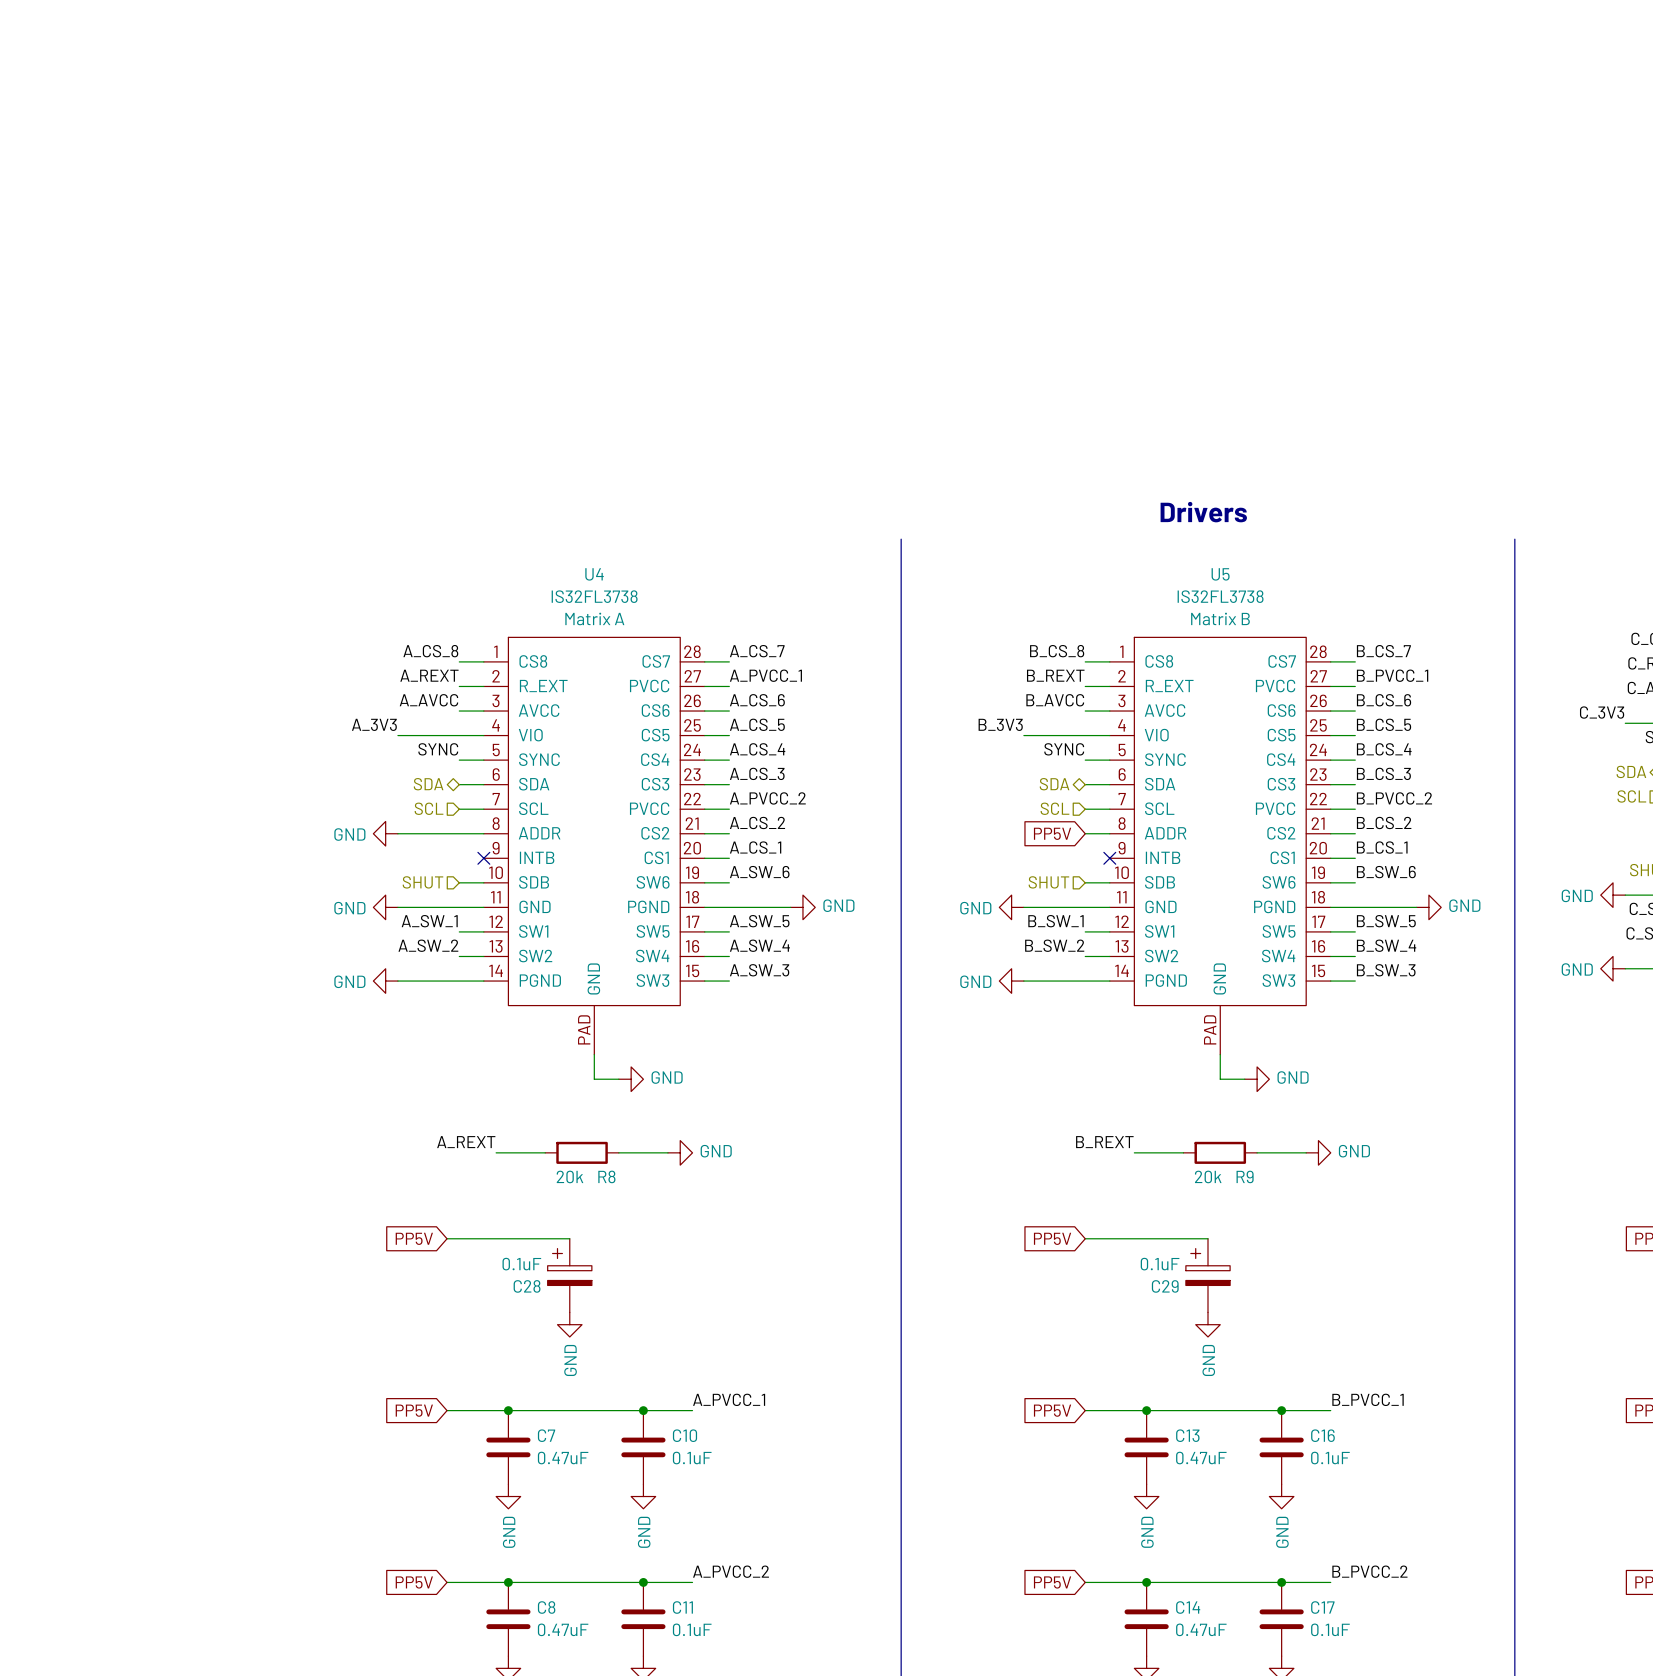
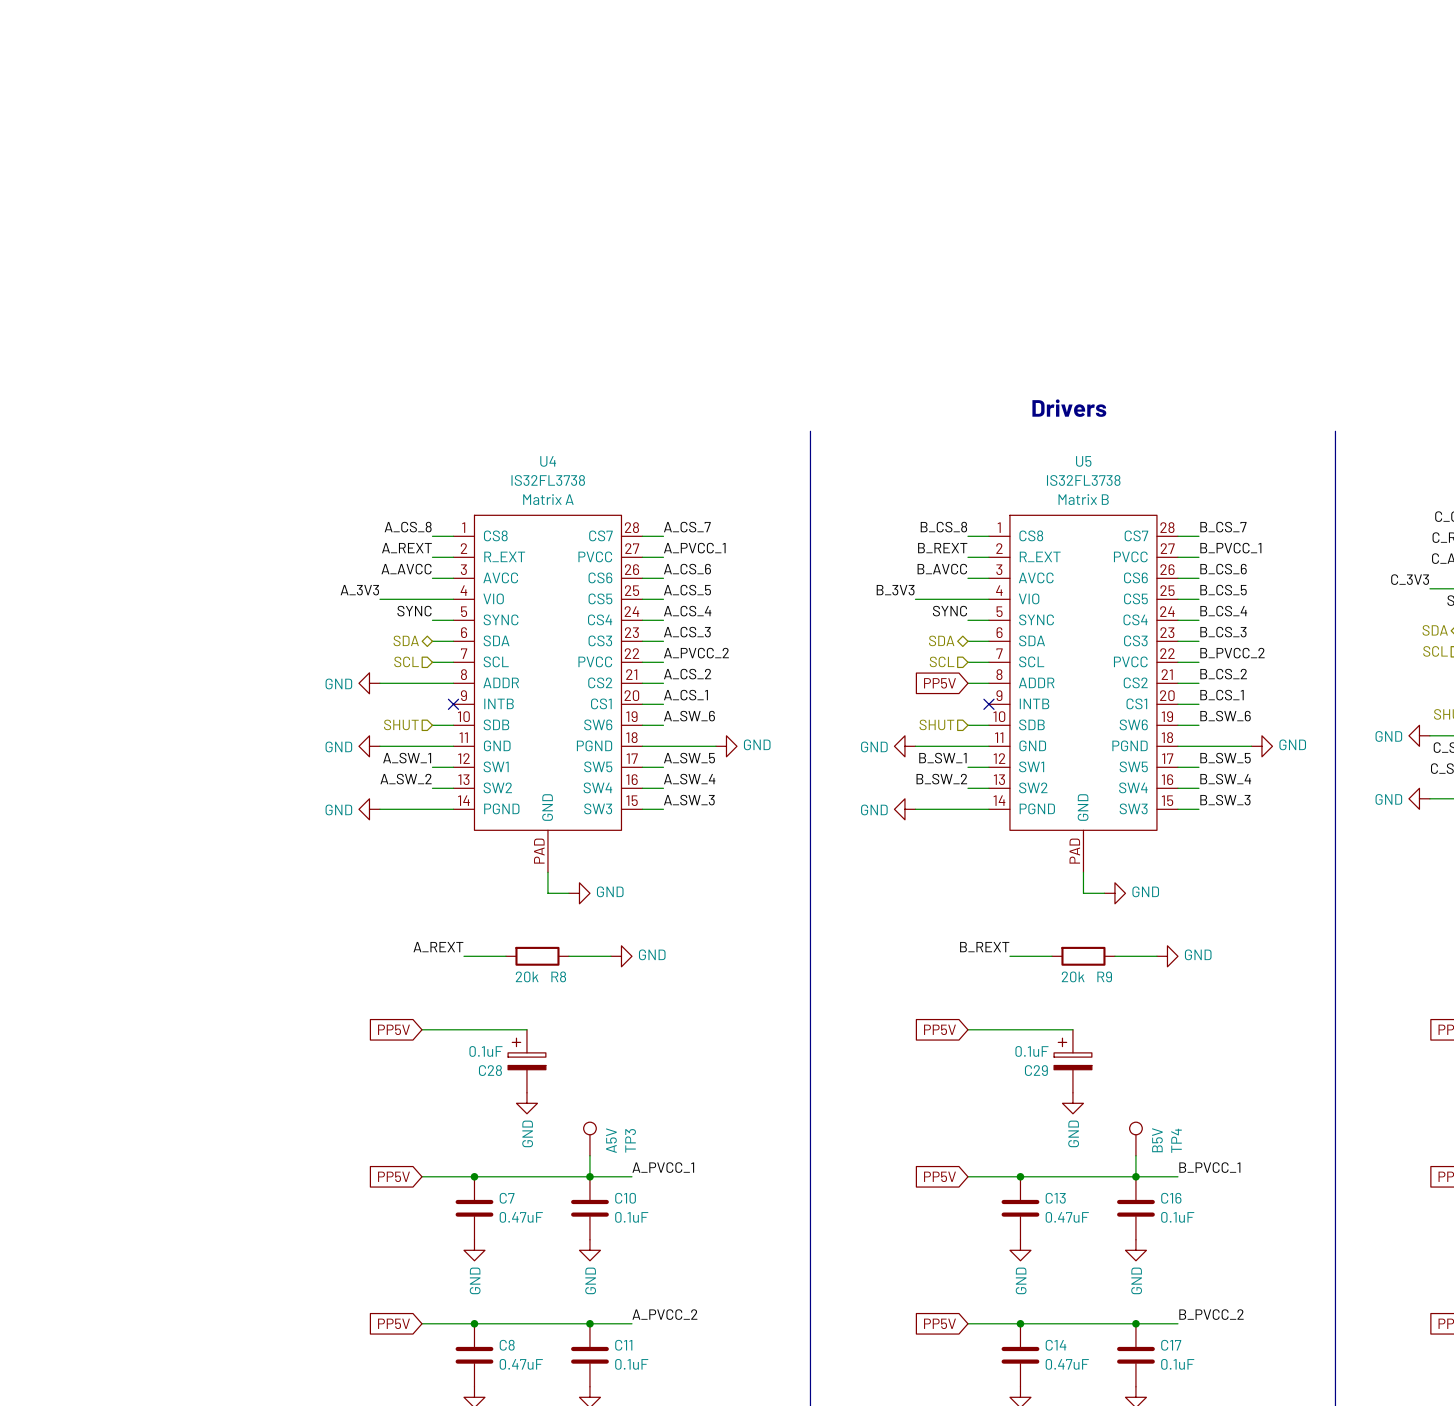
TP3: none -> A5V (589, 1138)
TP4: none -> B5V (1135, 1138)
wire: none -> (589, 1155) (589, 1176)
wire: none -> (1135, 1155) (1135, 1176)

